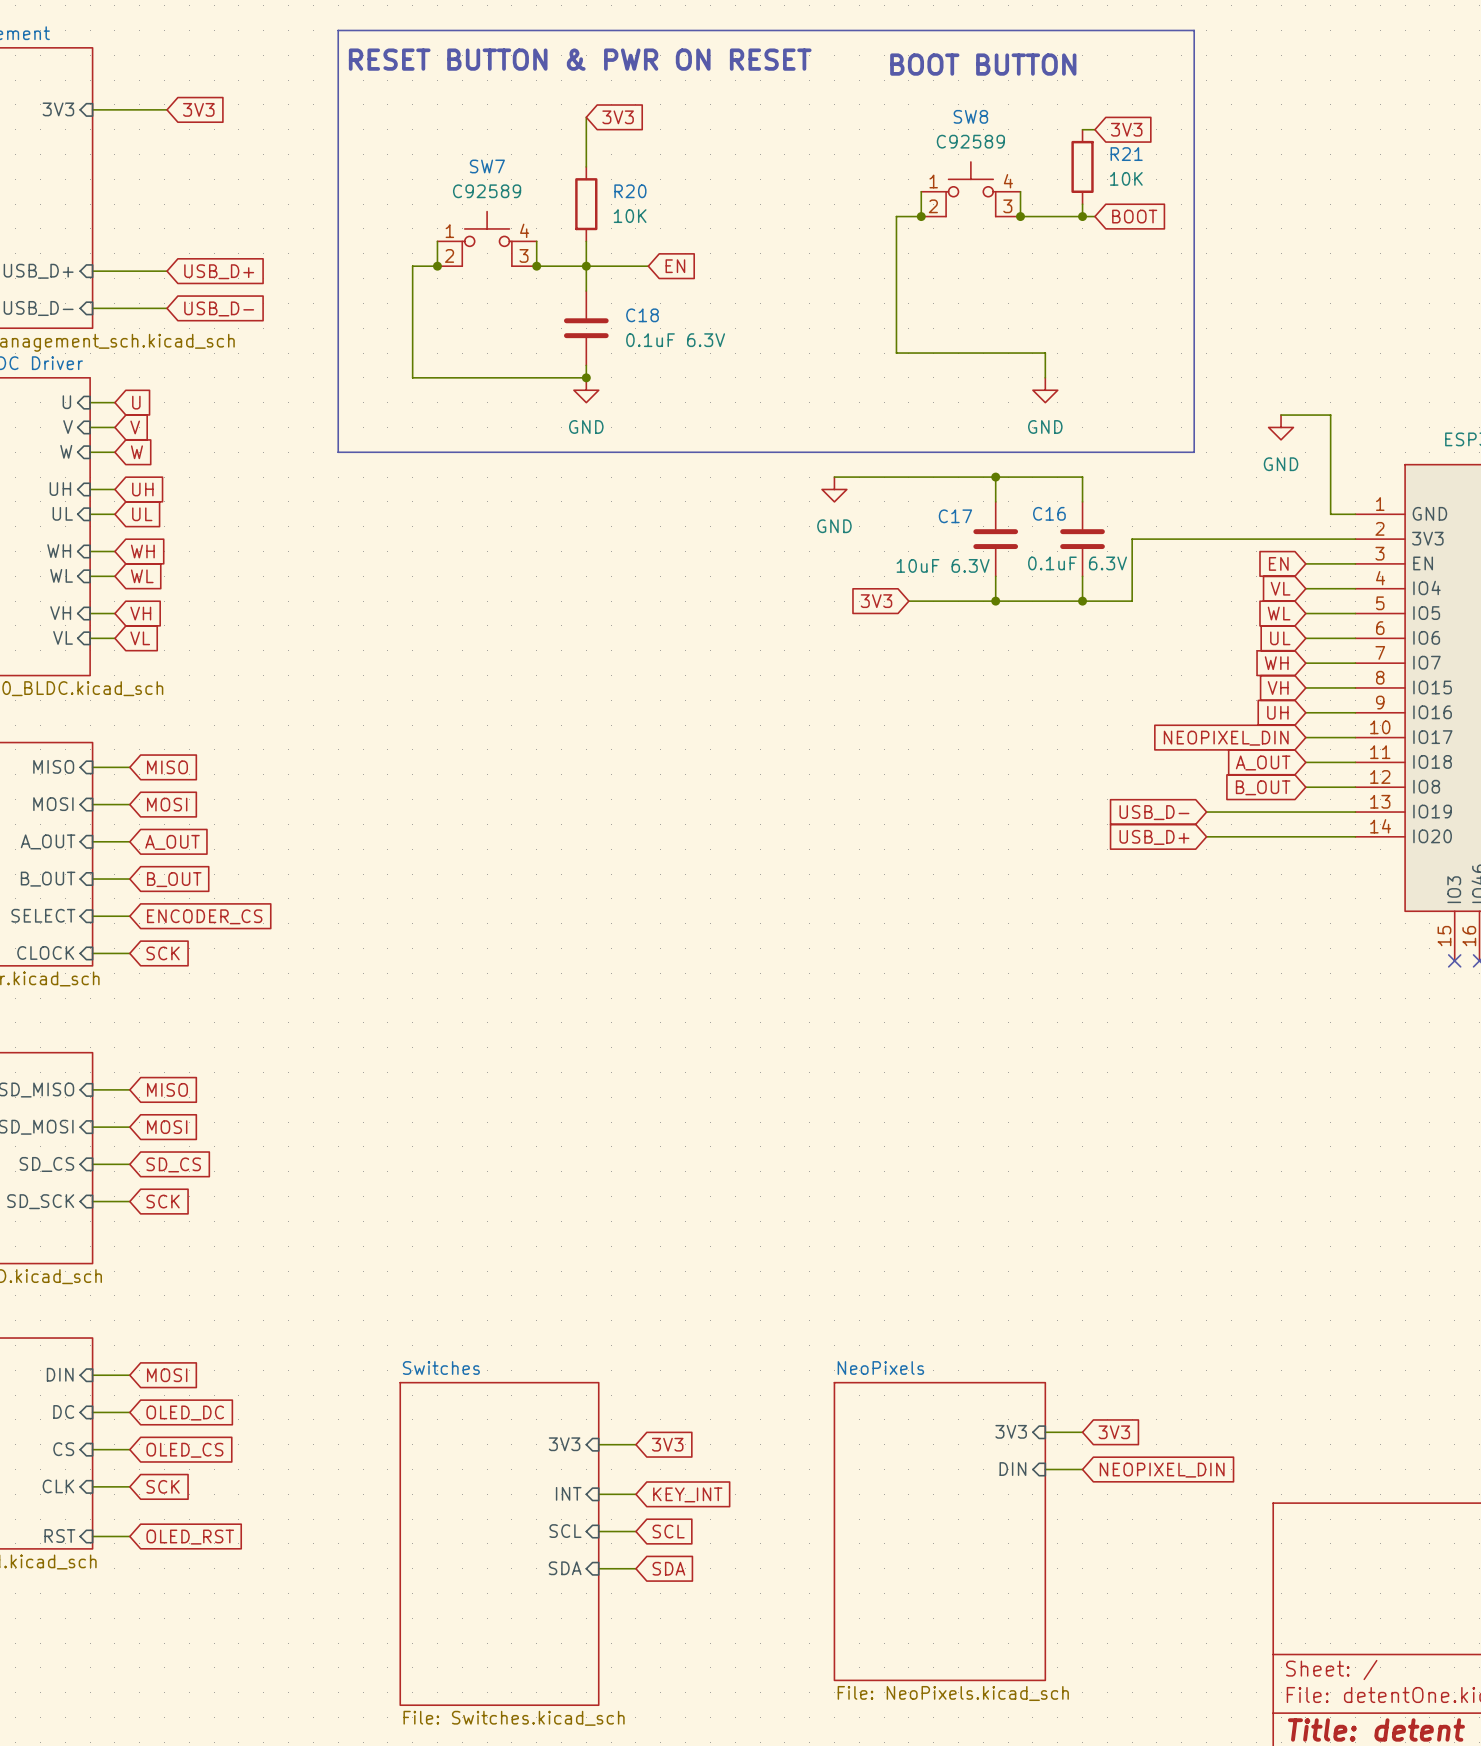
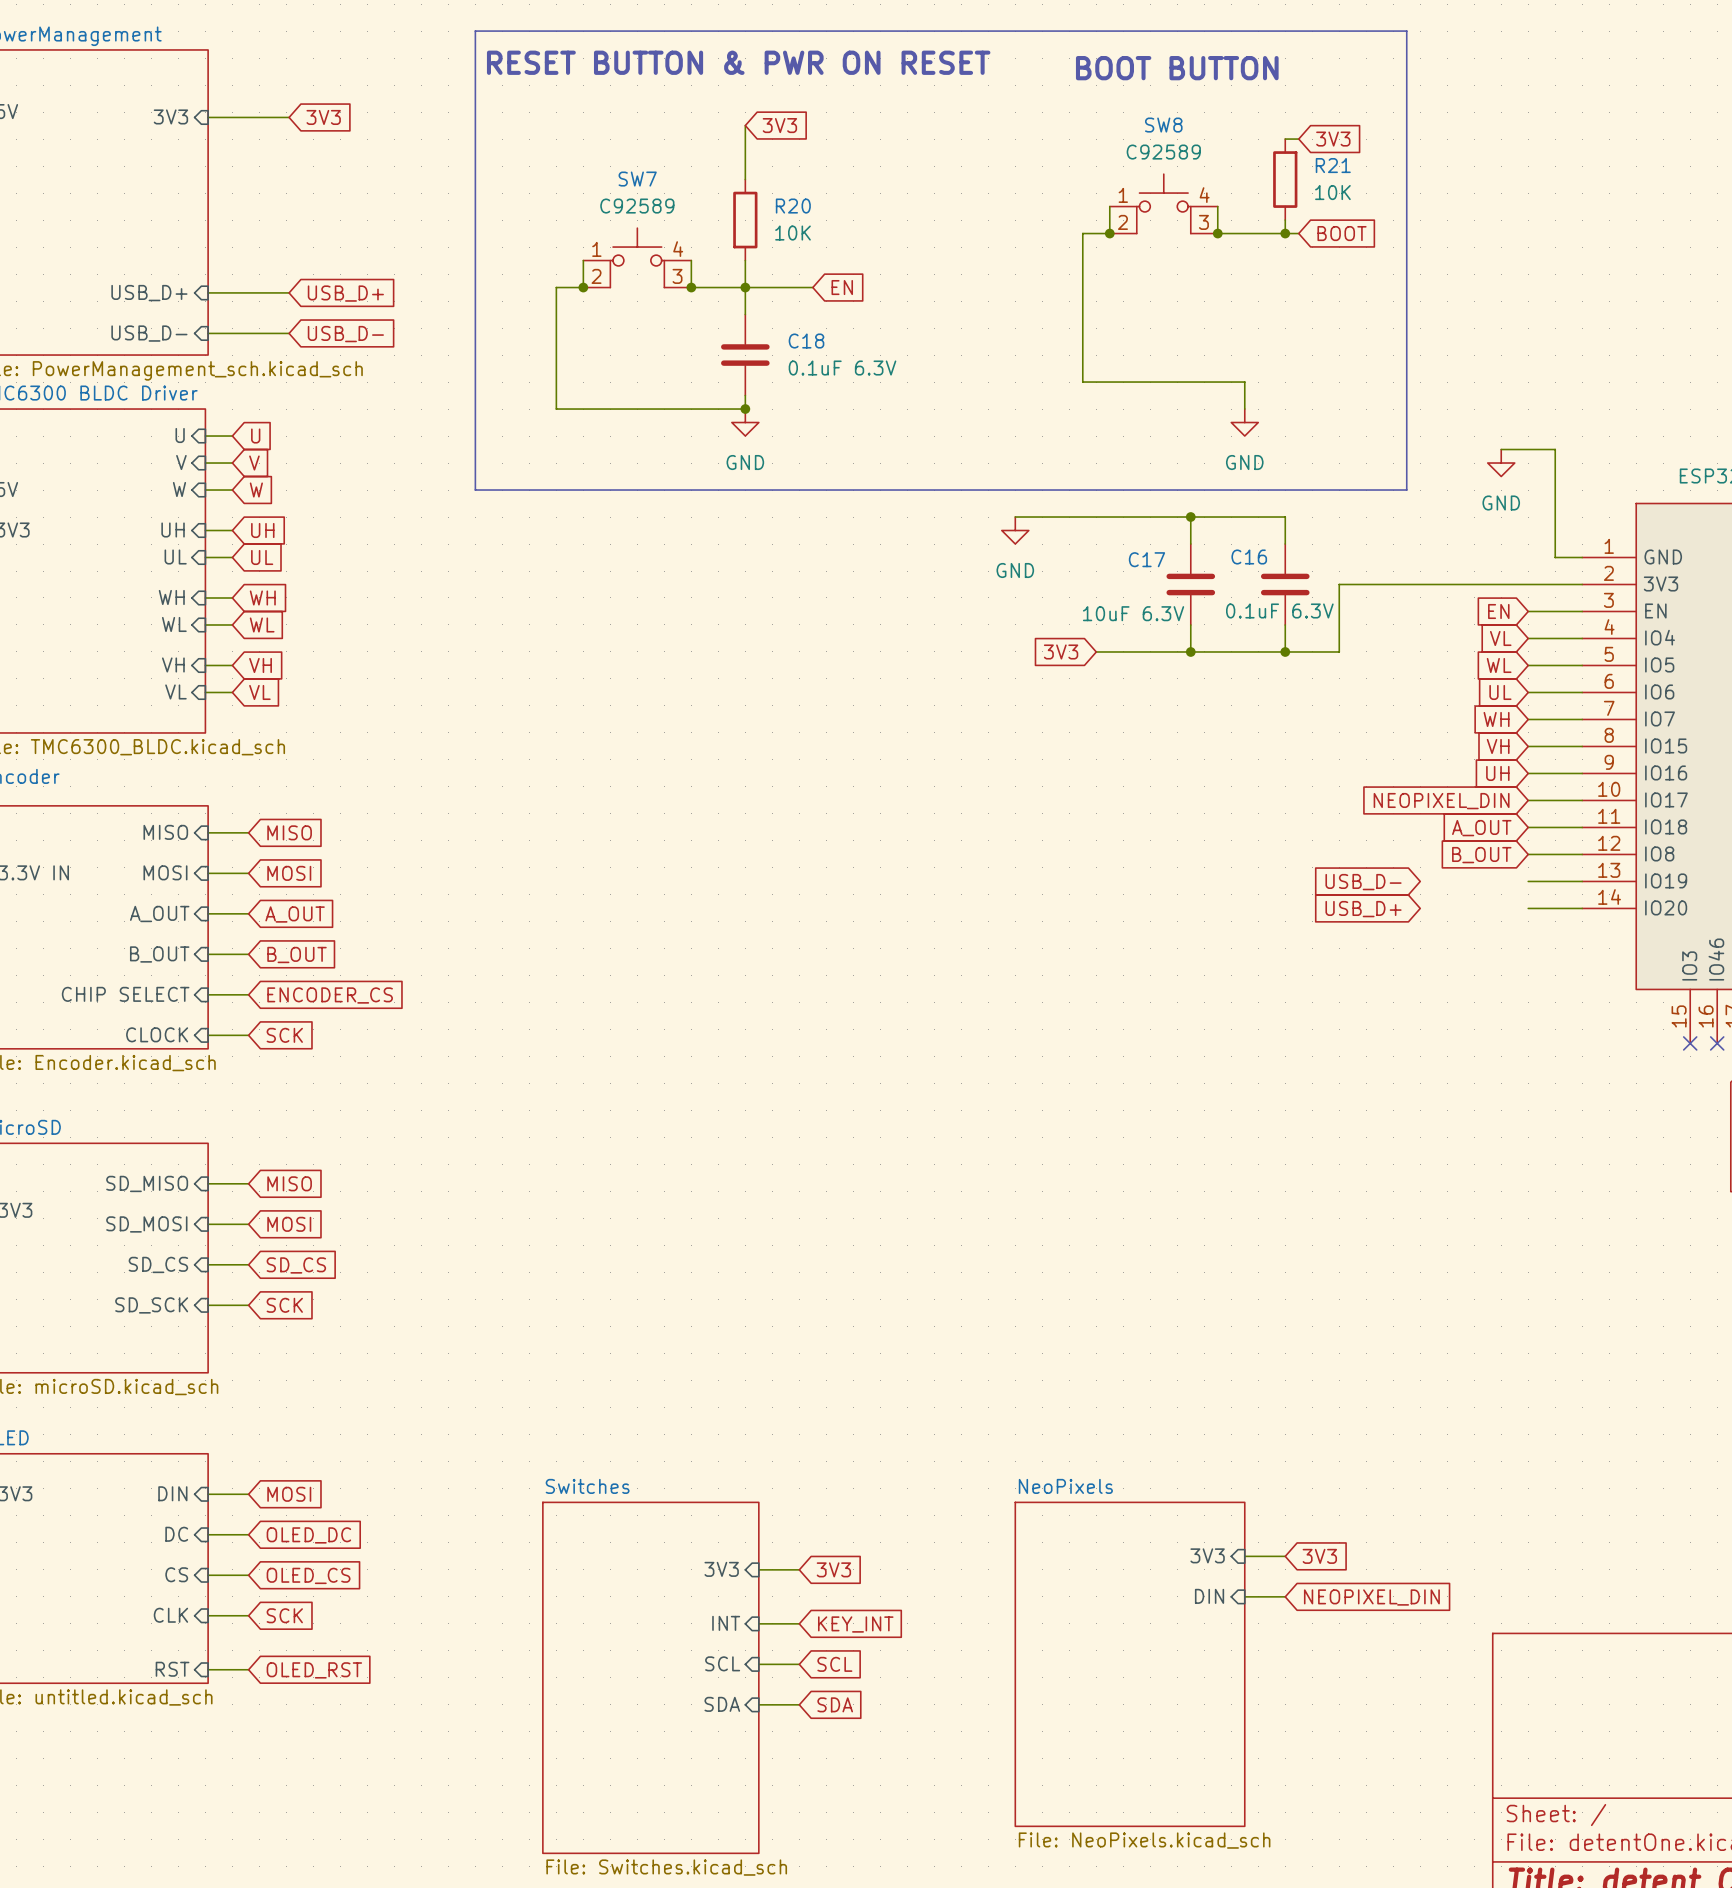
wire: (1206, 812) (1305, 812) -> none
wire: (1206, 836) (1305, 836) -> none

